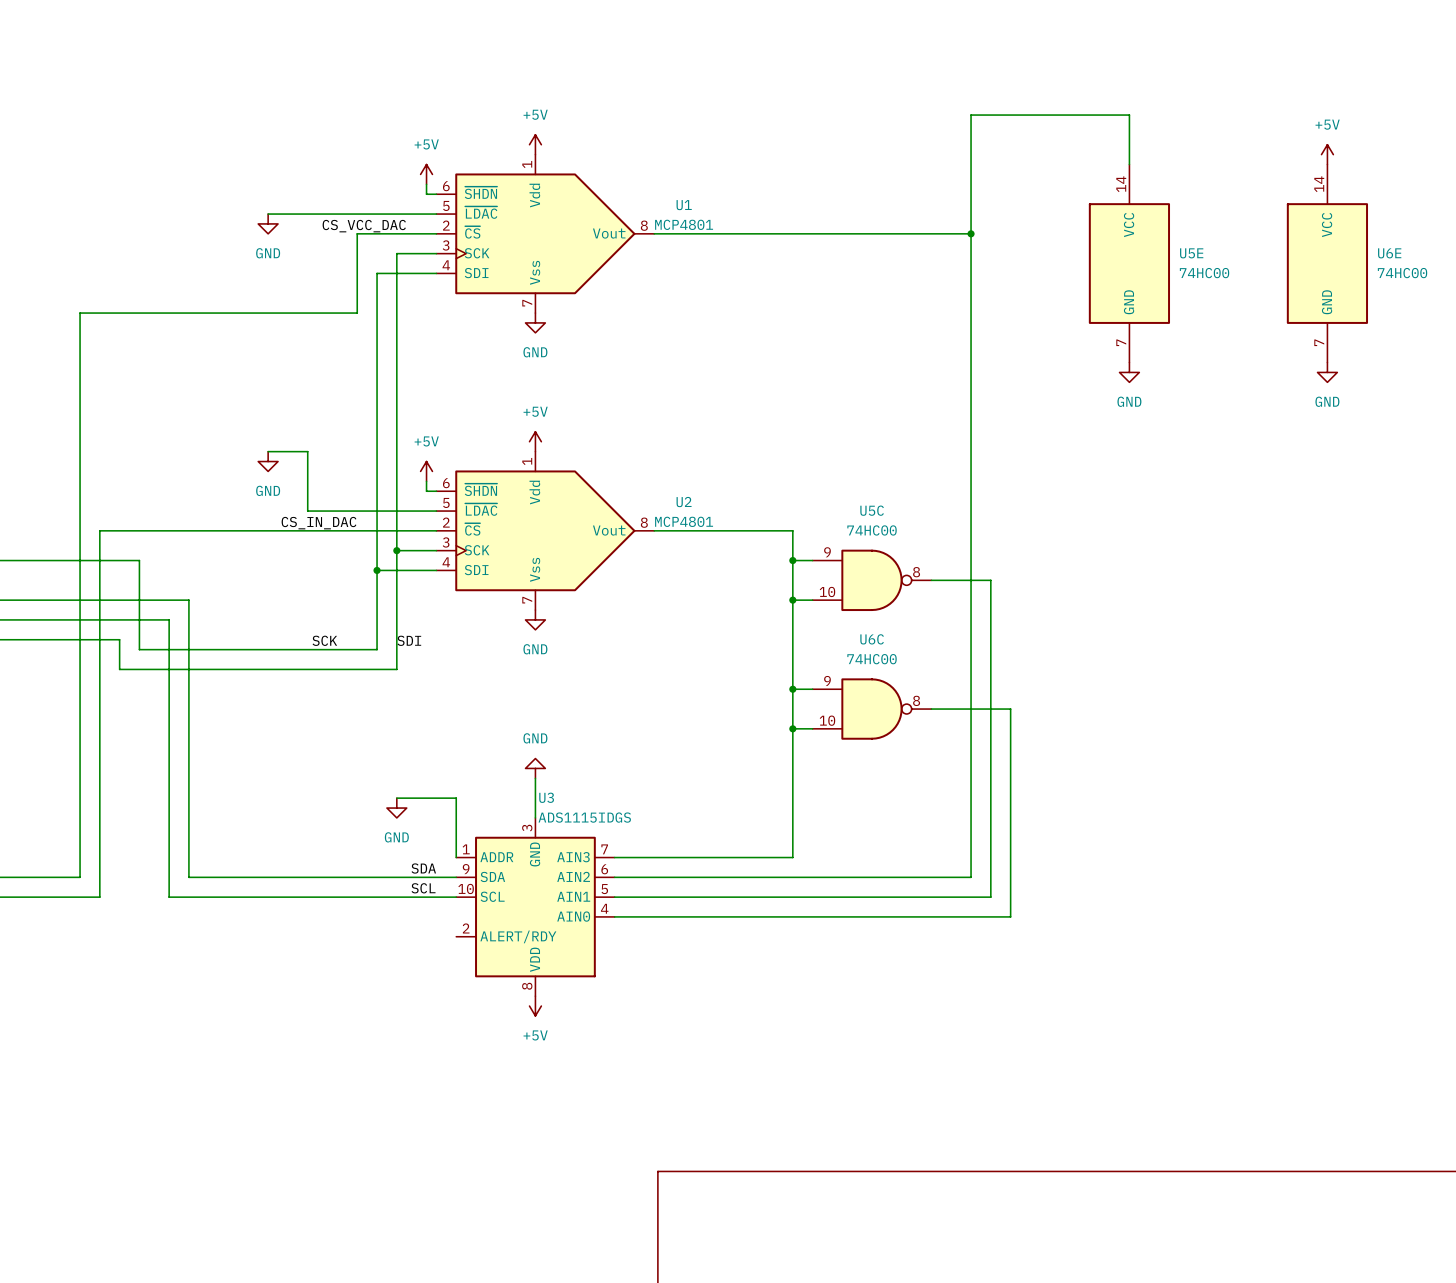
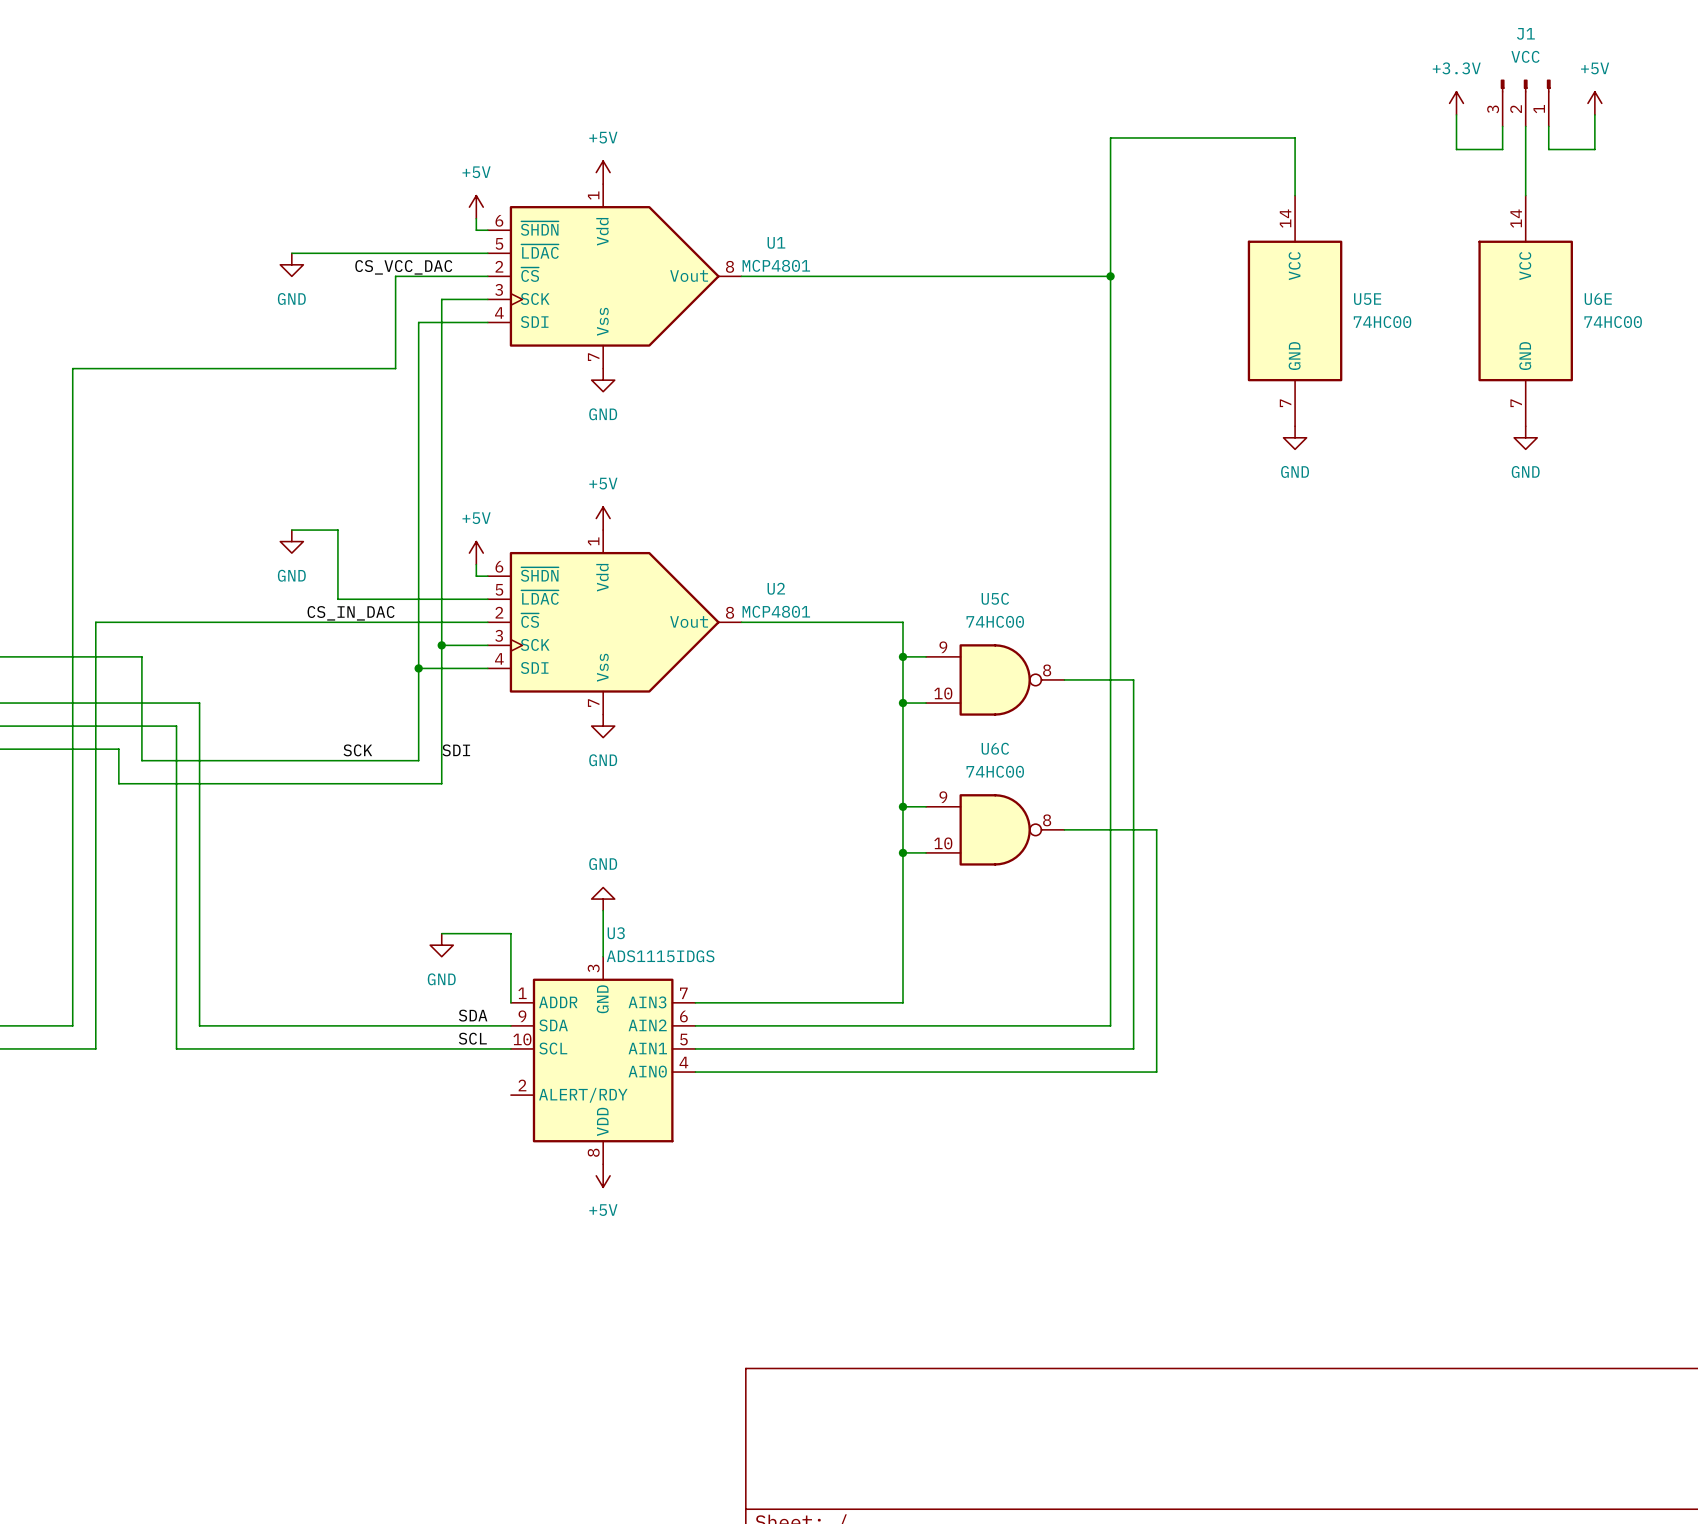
power symbol: none -> +3.3V (1456, 103)
J1: none -> VCC (1525, 103)
wire: none -> (1456, 114) (1456, 149) (1502, 149) (1502, 126)
wire: none -> (1594, 114) (1594, 149) (1548, 149) (1548, 126)
wire: none -> (1525, 126) (1525, 195)
power symbol position: +5V (1327, 154) -> +5V (1594, 103)

